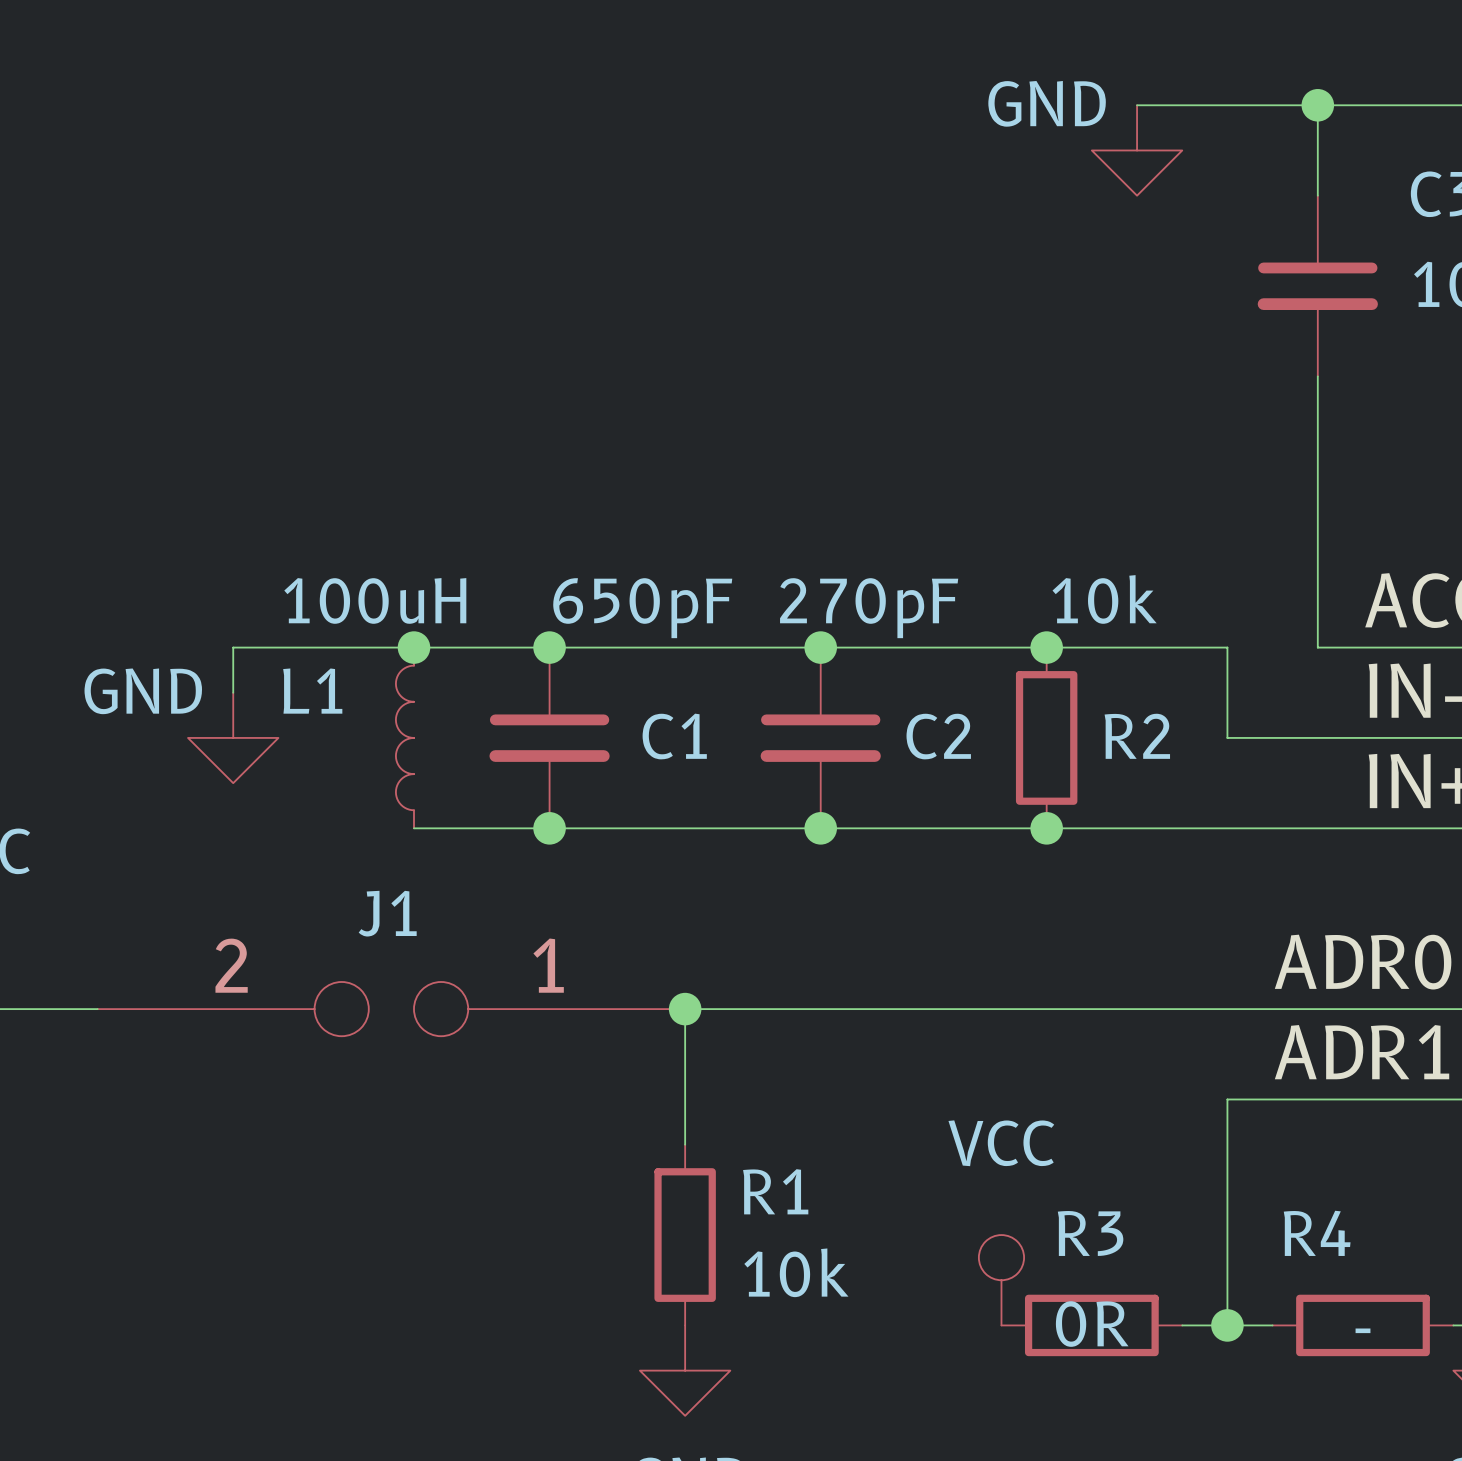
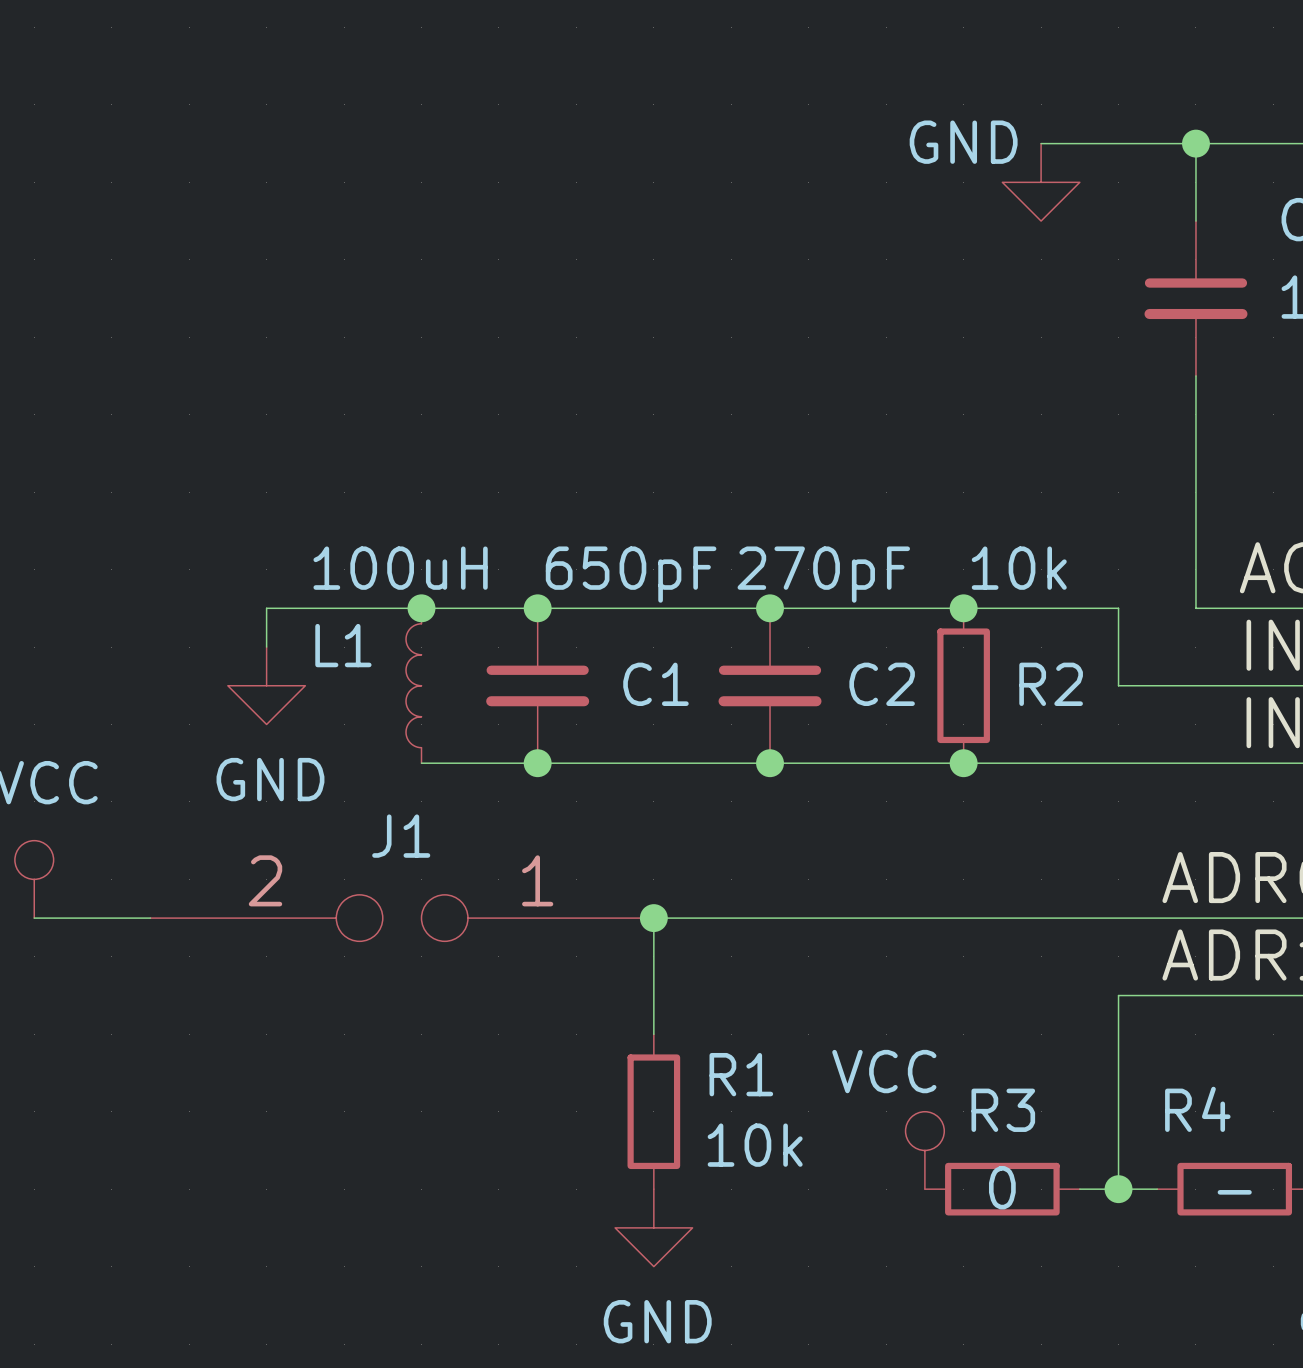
power symbol text position: GND (143, 691) -> GND (270, 779)
power symbol text position: VCC (1001, 1143) -> VCC (884, 1071)
R3 value: 0R (1092, 1324) -> 0 (1002, 1187)

